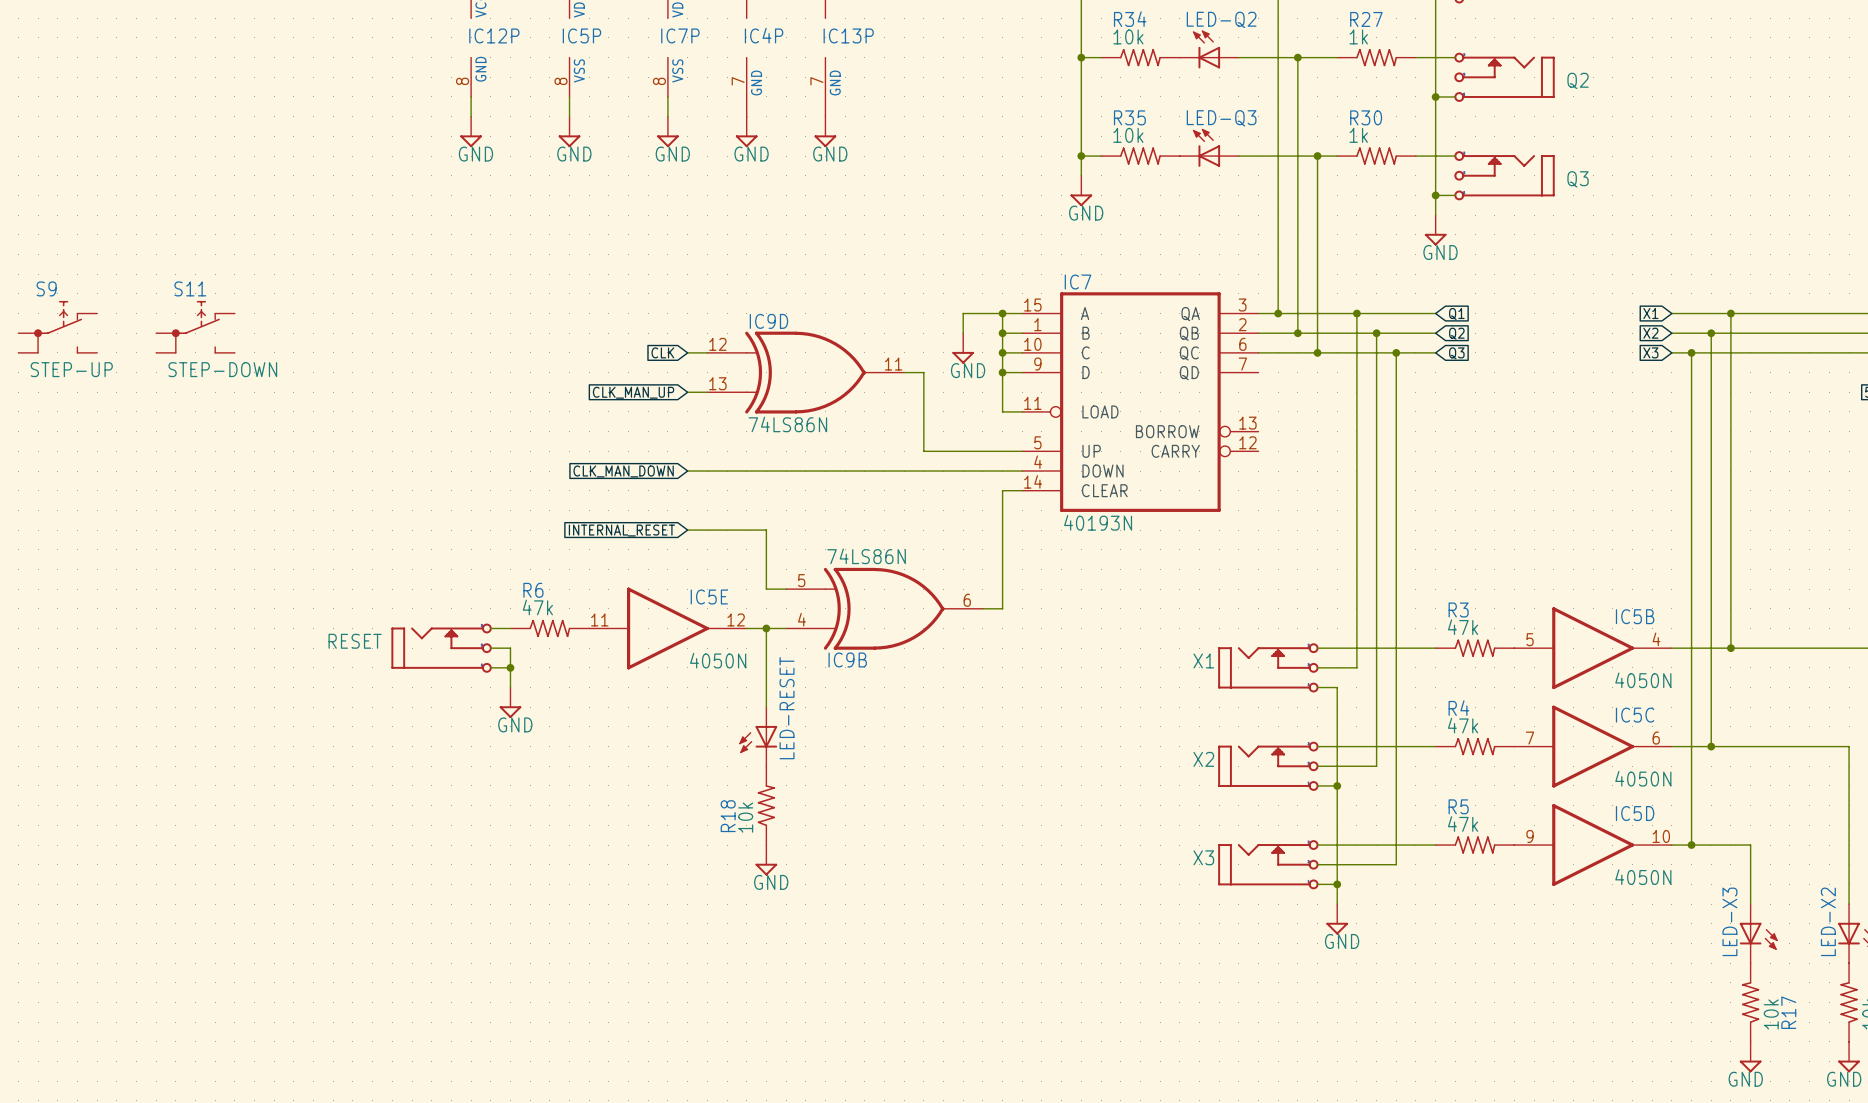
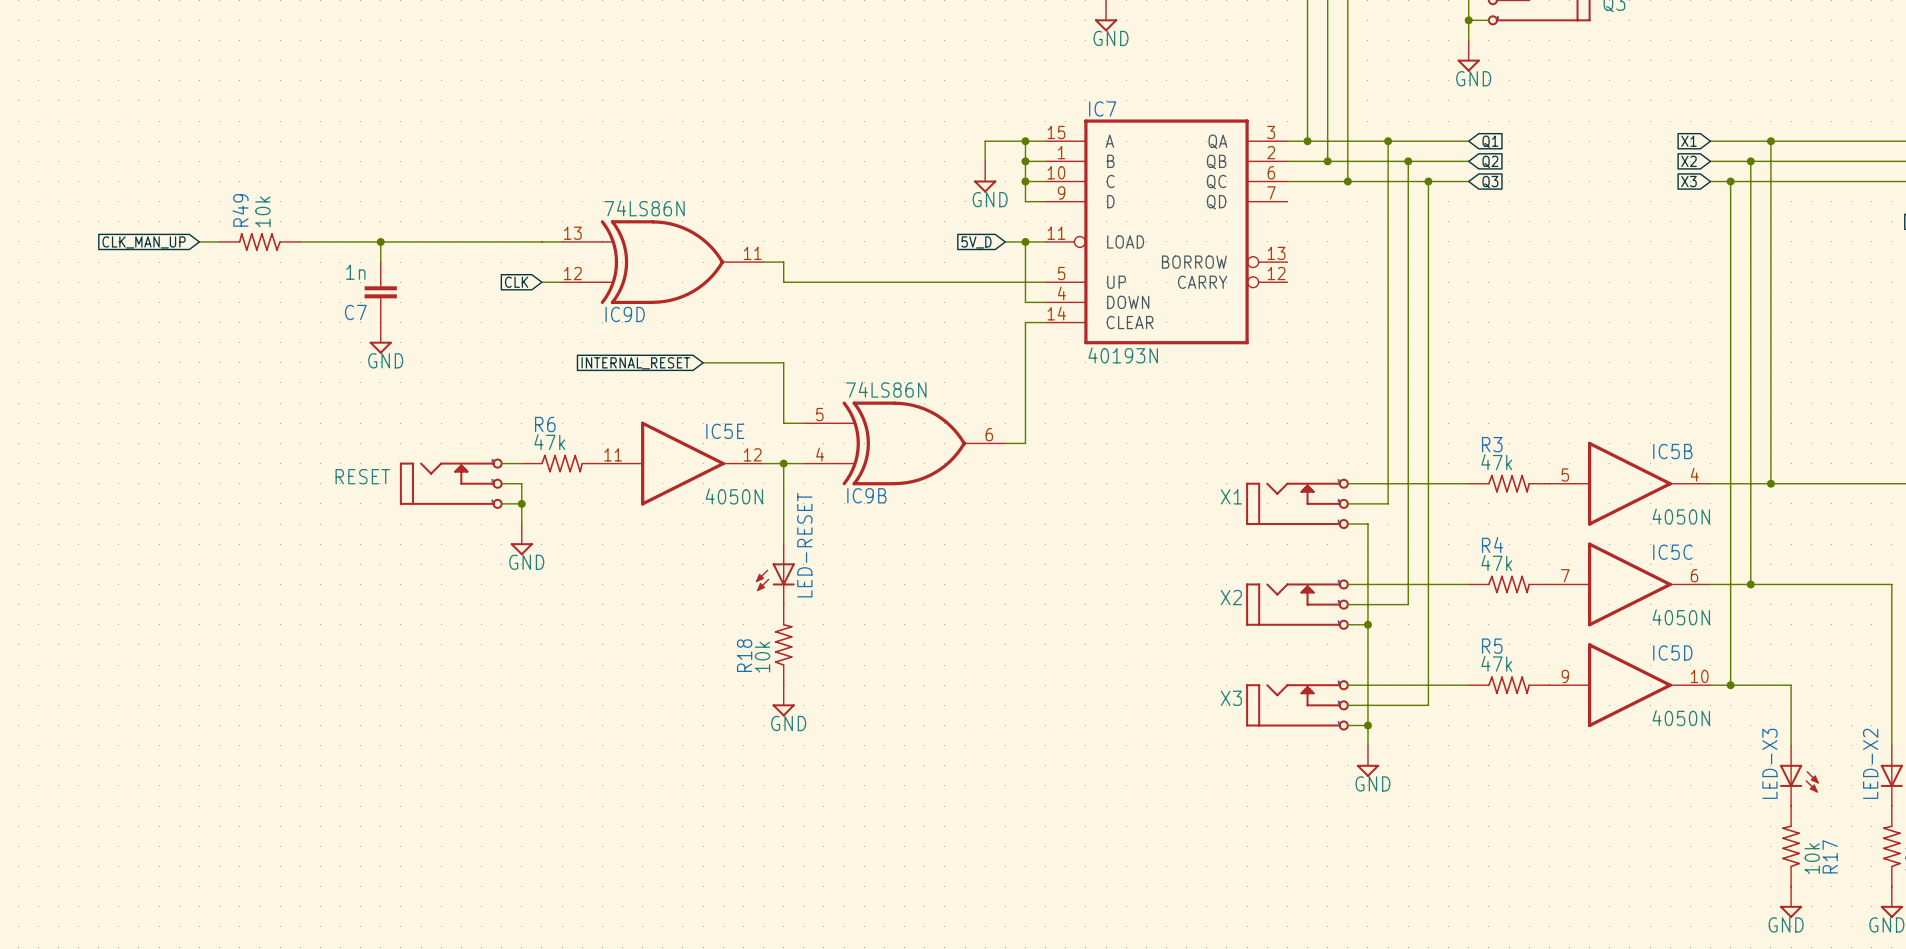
S9: STEP-UP (57, 327) -> none
S11: STEP-DOWN (195, 327) -> none
global label position: CLK (662, 352) -> CLK (516, 282)
wire: (687, 352) (707, 352) -> none
IC9D flip: as is (805, 372) -> up-down (662, 262)
IC9D position: (805, 372) -> (662, 262)
wire: (904, 372) (923, 372) (923, 451) -> (763, 262) (783, 262) (783, 282) (944, 282)
wire: (1002, 372) (1002, 411) -> none
junction position: (1002, 372) -> (1025, 241)
global label: CLK_MAN_UP (633, 392) -> none
wire: (687, 392) (707, 392) -> (541, 282) (562, 282)
wire: none -> (199, 241) (219, 241)
R49: none -> 10k (259, 241)
wire: none -> (300, 241) (562, 241)
wire: none -> (380, 241) (380, 262)
junction: none -> (380, 241)
global label: none -> CLK_MAN_UP (144, 242)
global label: none -> 5V_D (976, 242)
C7: none -> 1n (380, 292)
global label: CLK_MAN_DOWN (623, 471) -> none
wire: (687, 471) (1002, 471) -> (1005, 241) (1025, 241) (1025, 302)
power symbol: none -> GND (380, 338)

